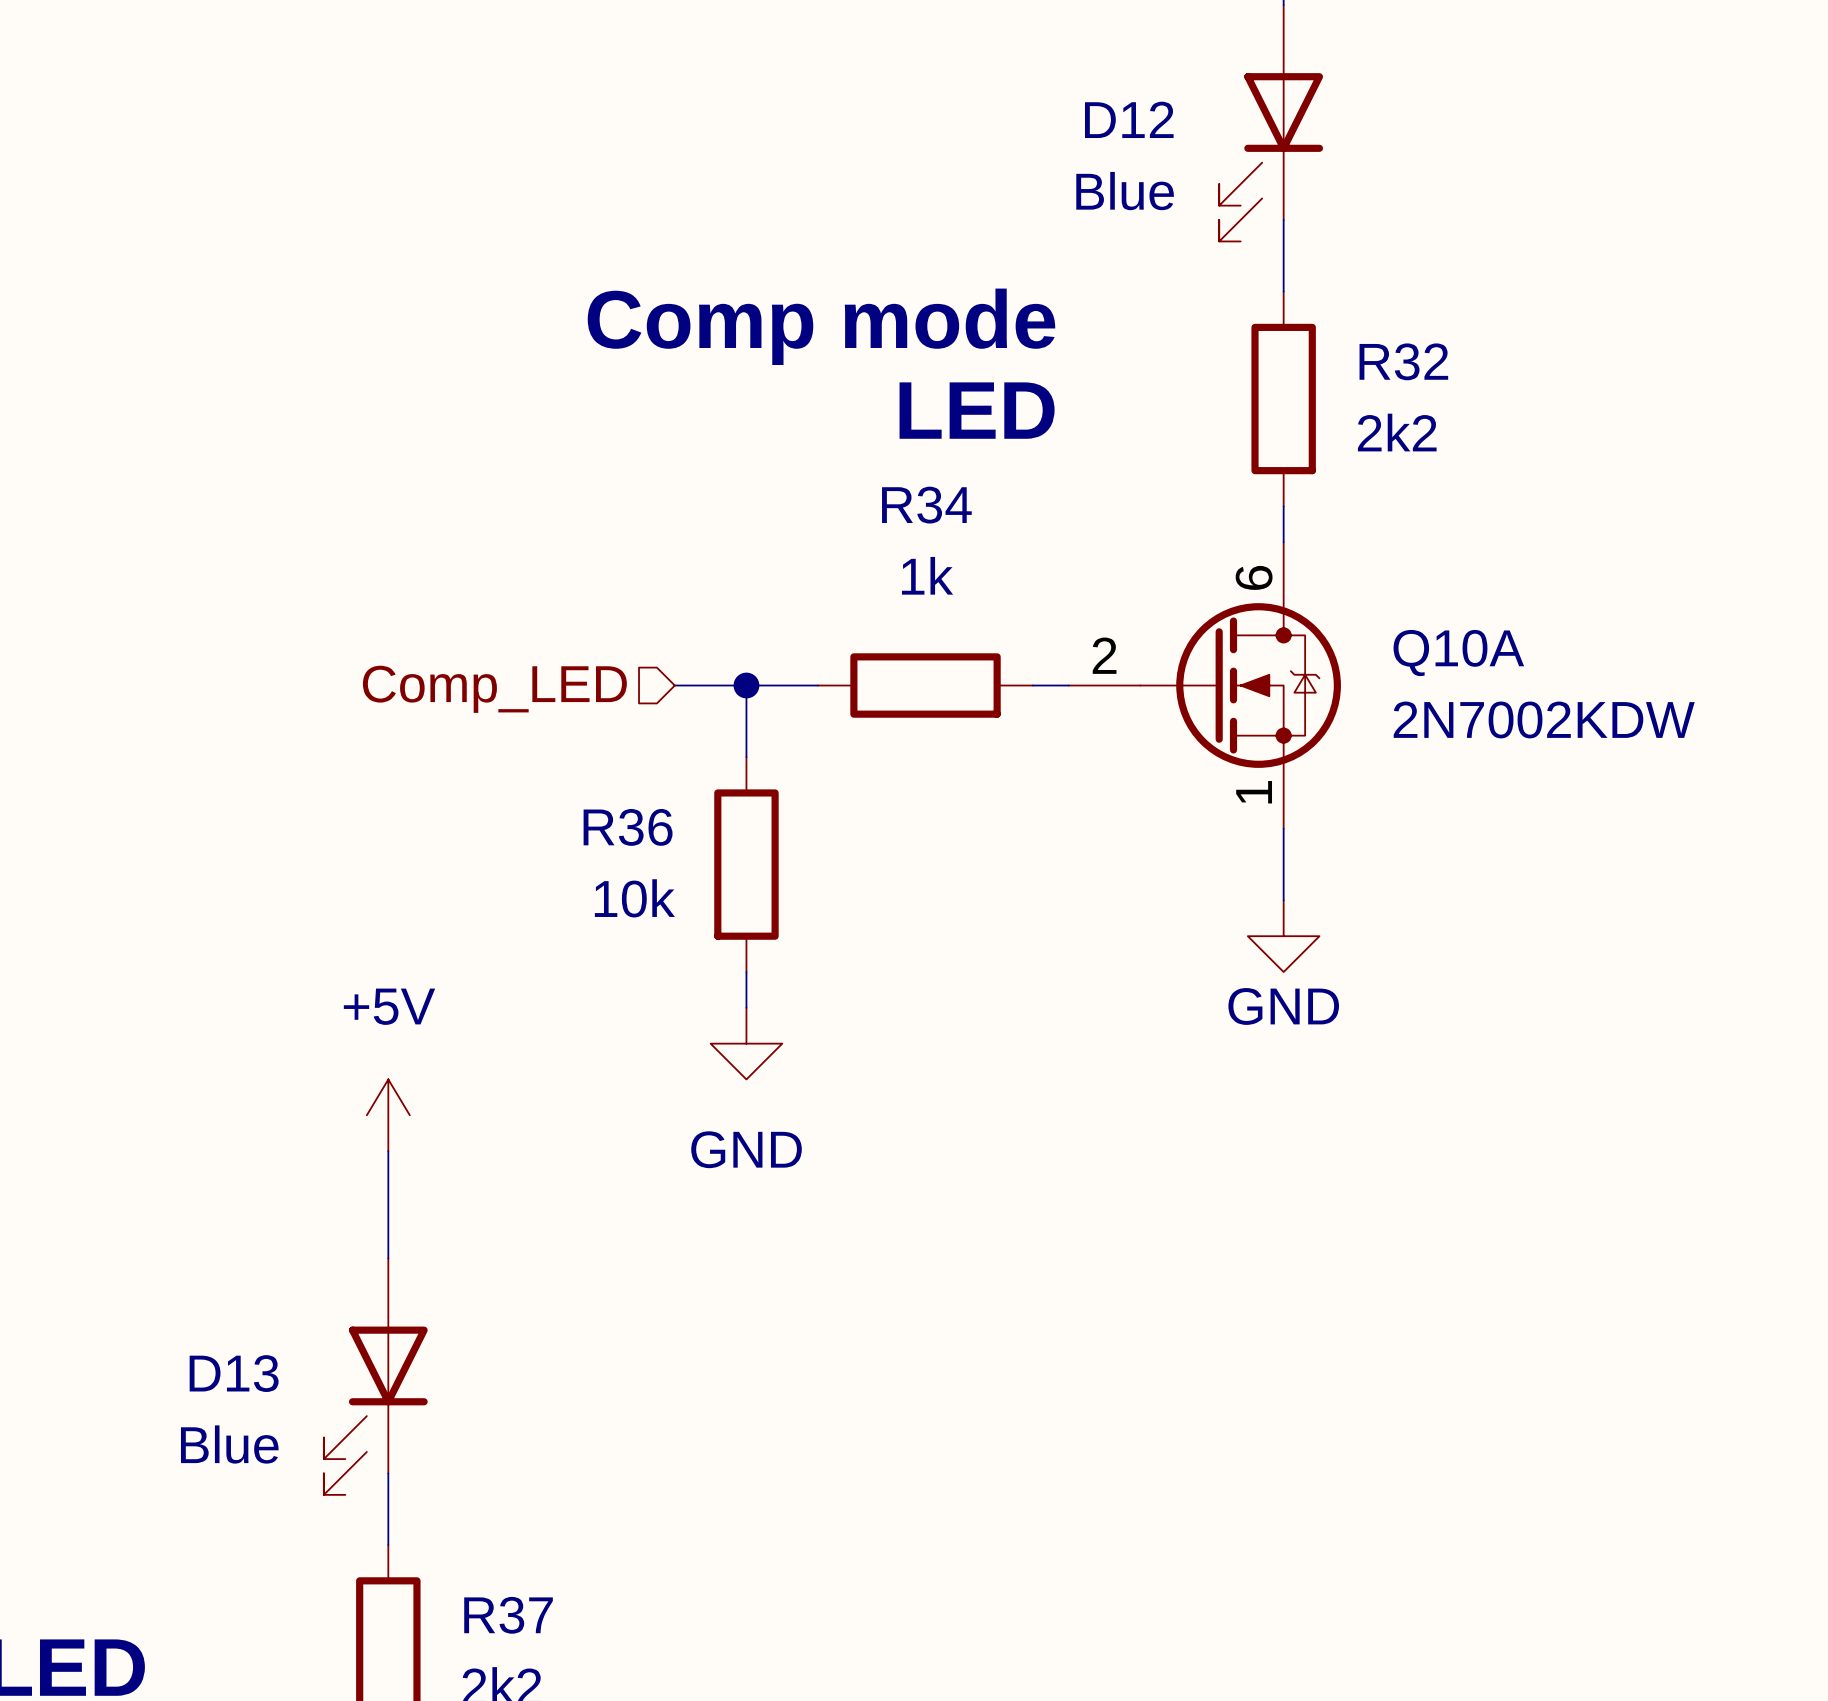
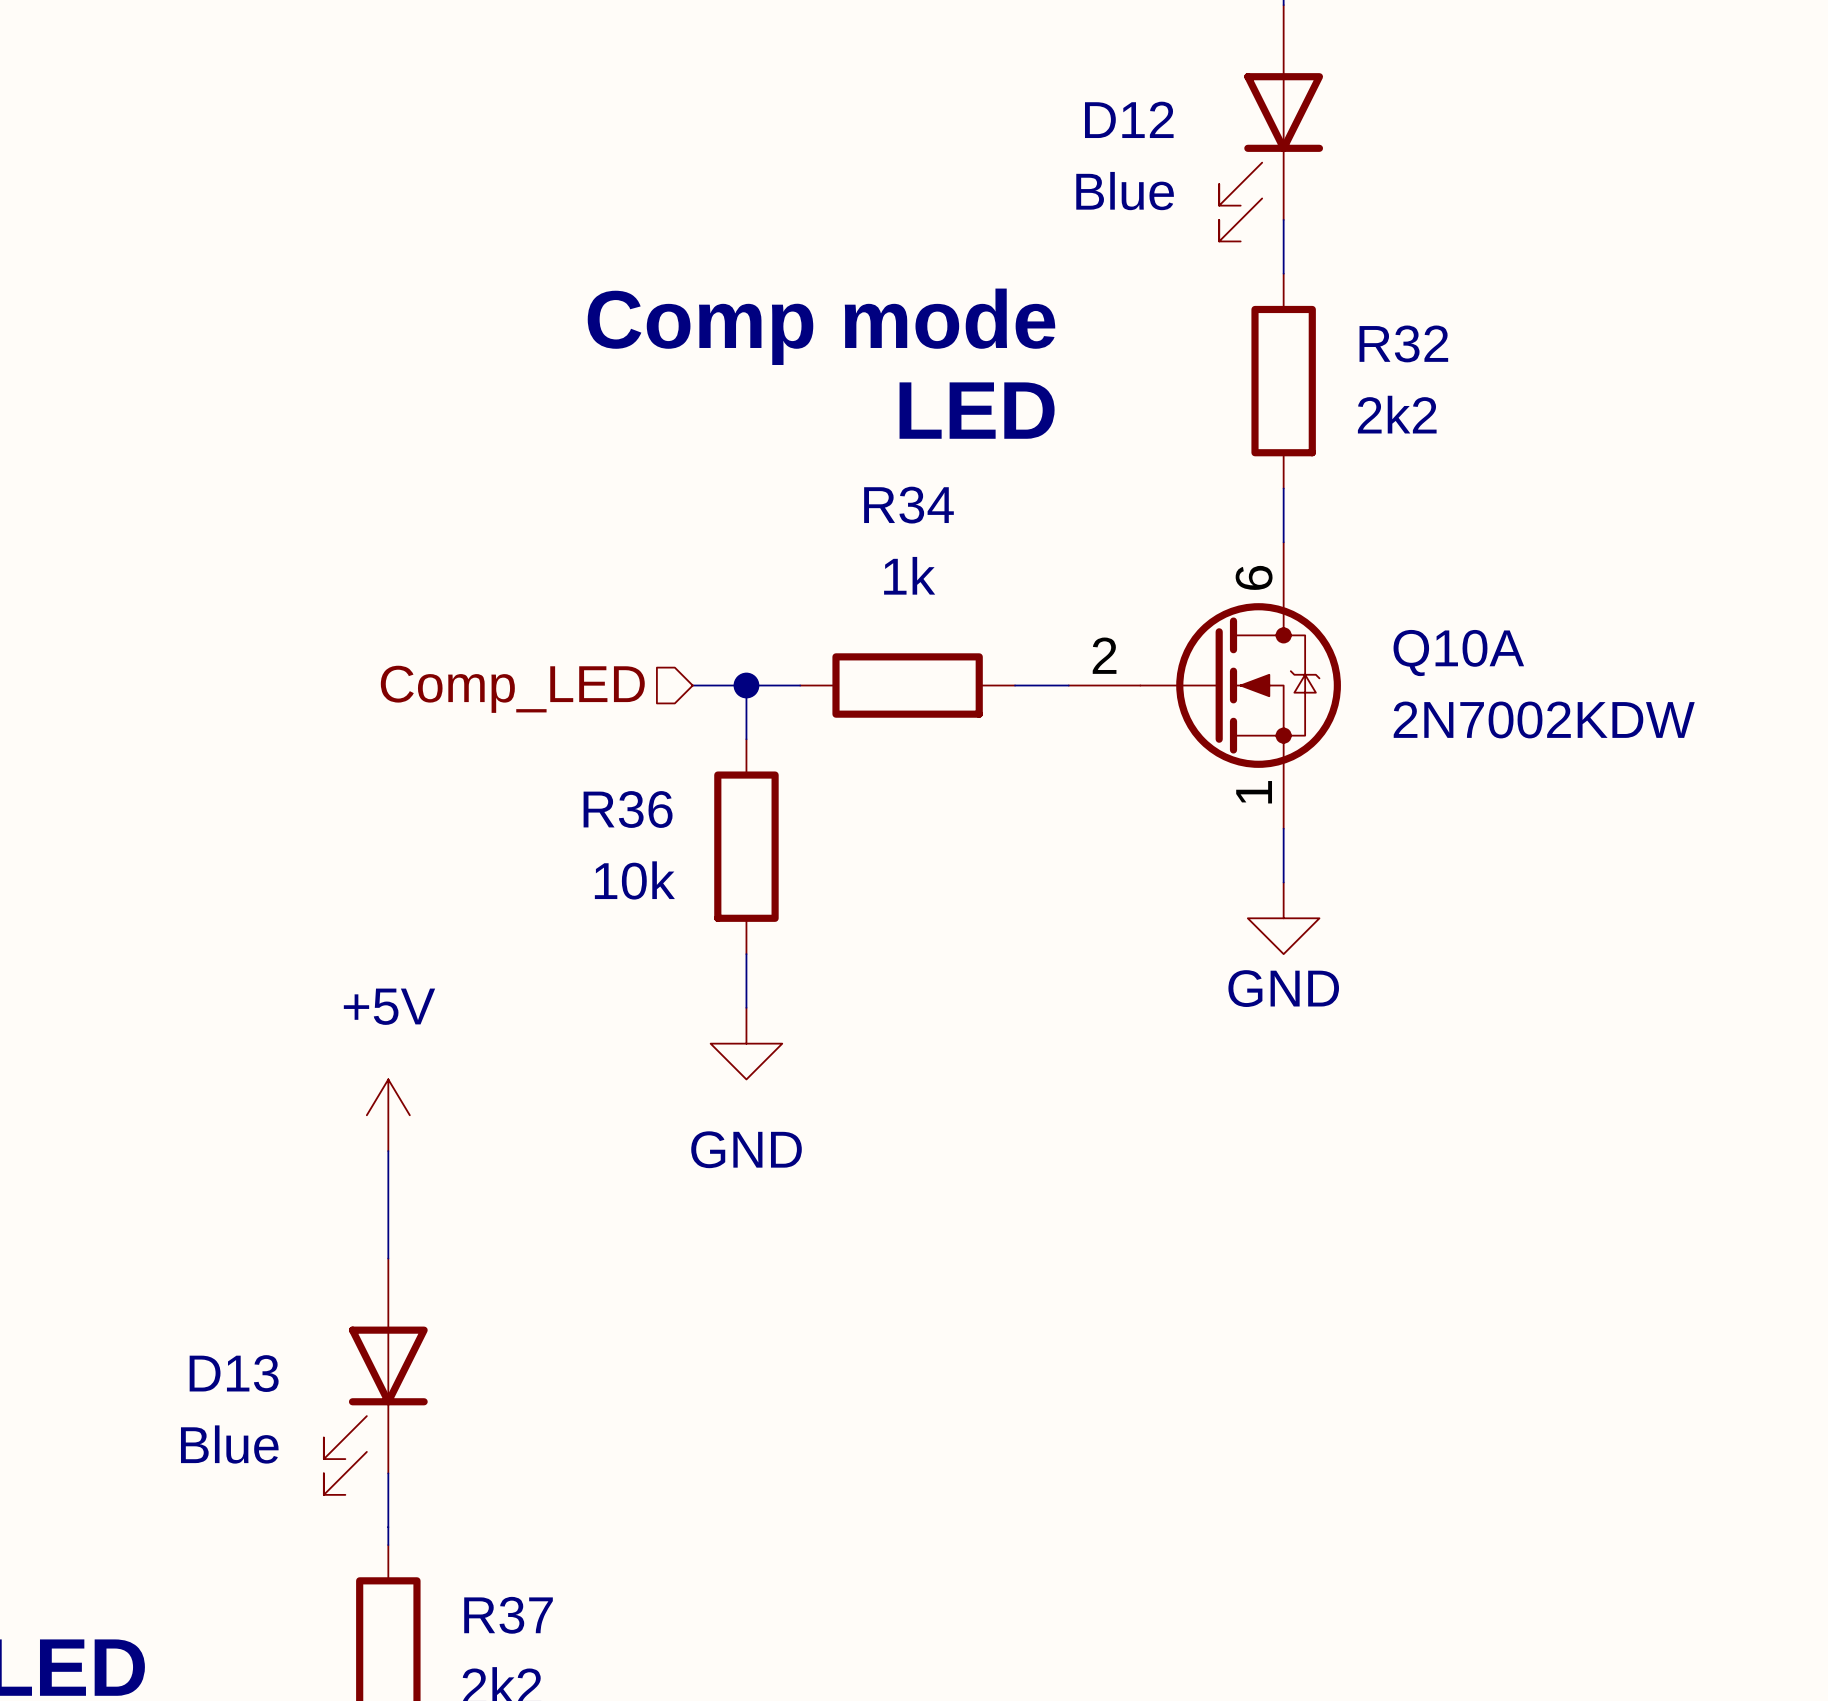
R32 position: (1283, 399) -> (1283, 381)
wire: (674, 685) (692, 685) -> none
R34 position: (925, 685) -> (907, 685)
hierarchical label position: Comp_LED (494, 689) -> Comp_LED (512, 689)
R36 position: (746, 864) -> (746, 846)
power symbol position: GND (1283, 936) -> GND (1283, 918)

